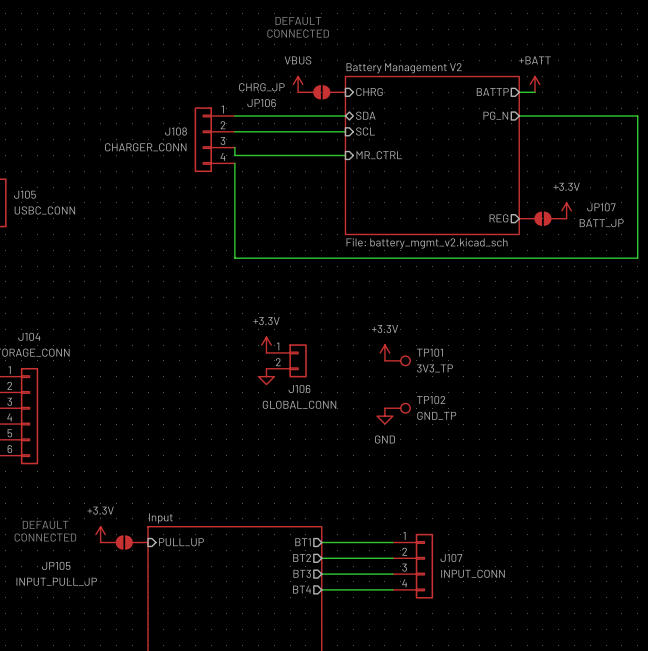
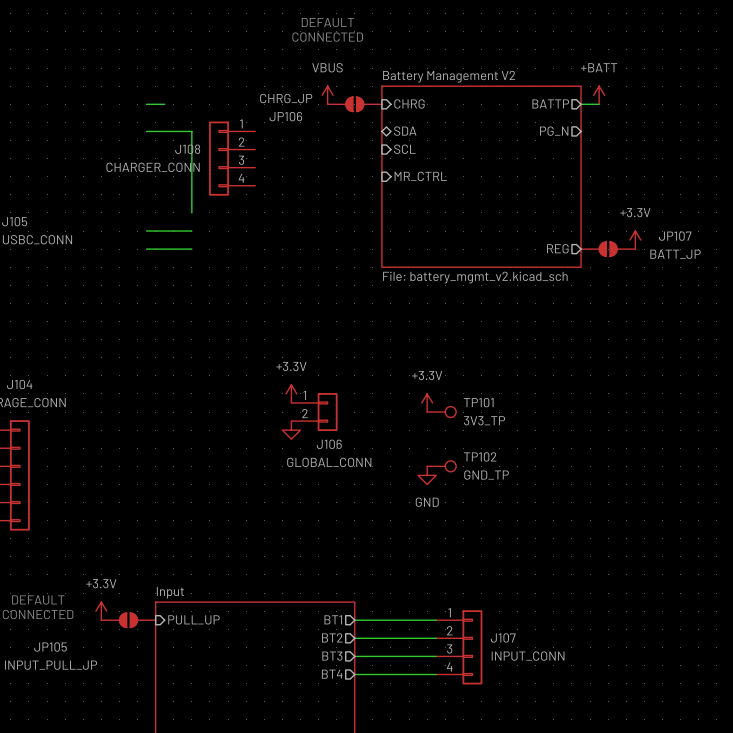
wire: none -> (146, 104) (164, 104)
wire: none -> (146, 131) (191, 131) (191, 212)
wire: (234, 116) (345, 116) -> none
wire: (519, 116) (637, 116) (637, 258) (234, 258) (234, 163) -> none
wire: (234, 131) (345, 131) -> none
wire: (234, 147) (234, 155) (345, 155) -> none
wire: none -> (146, 231) (191, 231)
wire: none -> (146, 249) (191, 249)

